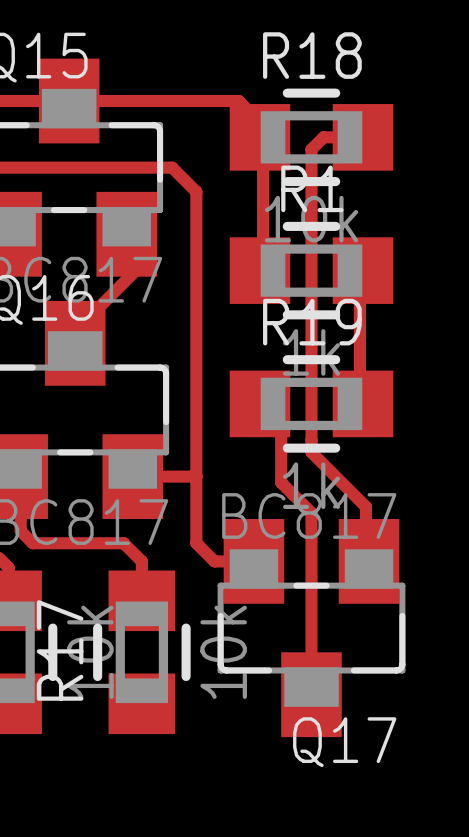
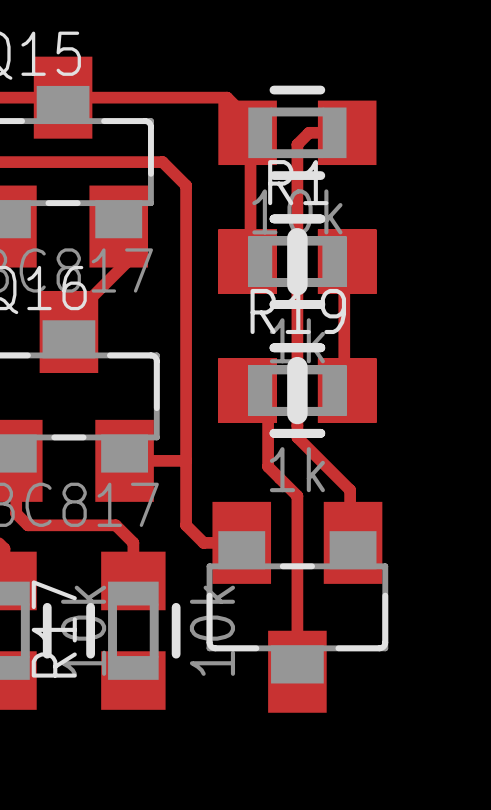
R18 name: R18 (312, 55) -> none
part: none -> (297, 261)
part: none -> (297, 390)
Q17 value: BC817 (309, 515) -> none
Q17 name: Q17 (344, 742) -> none

